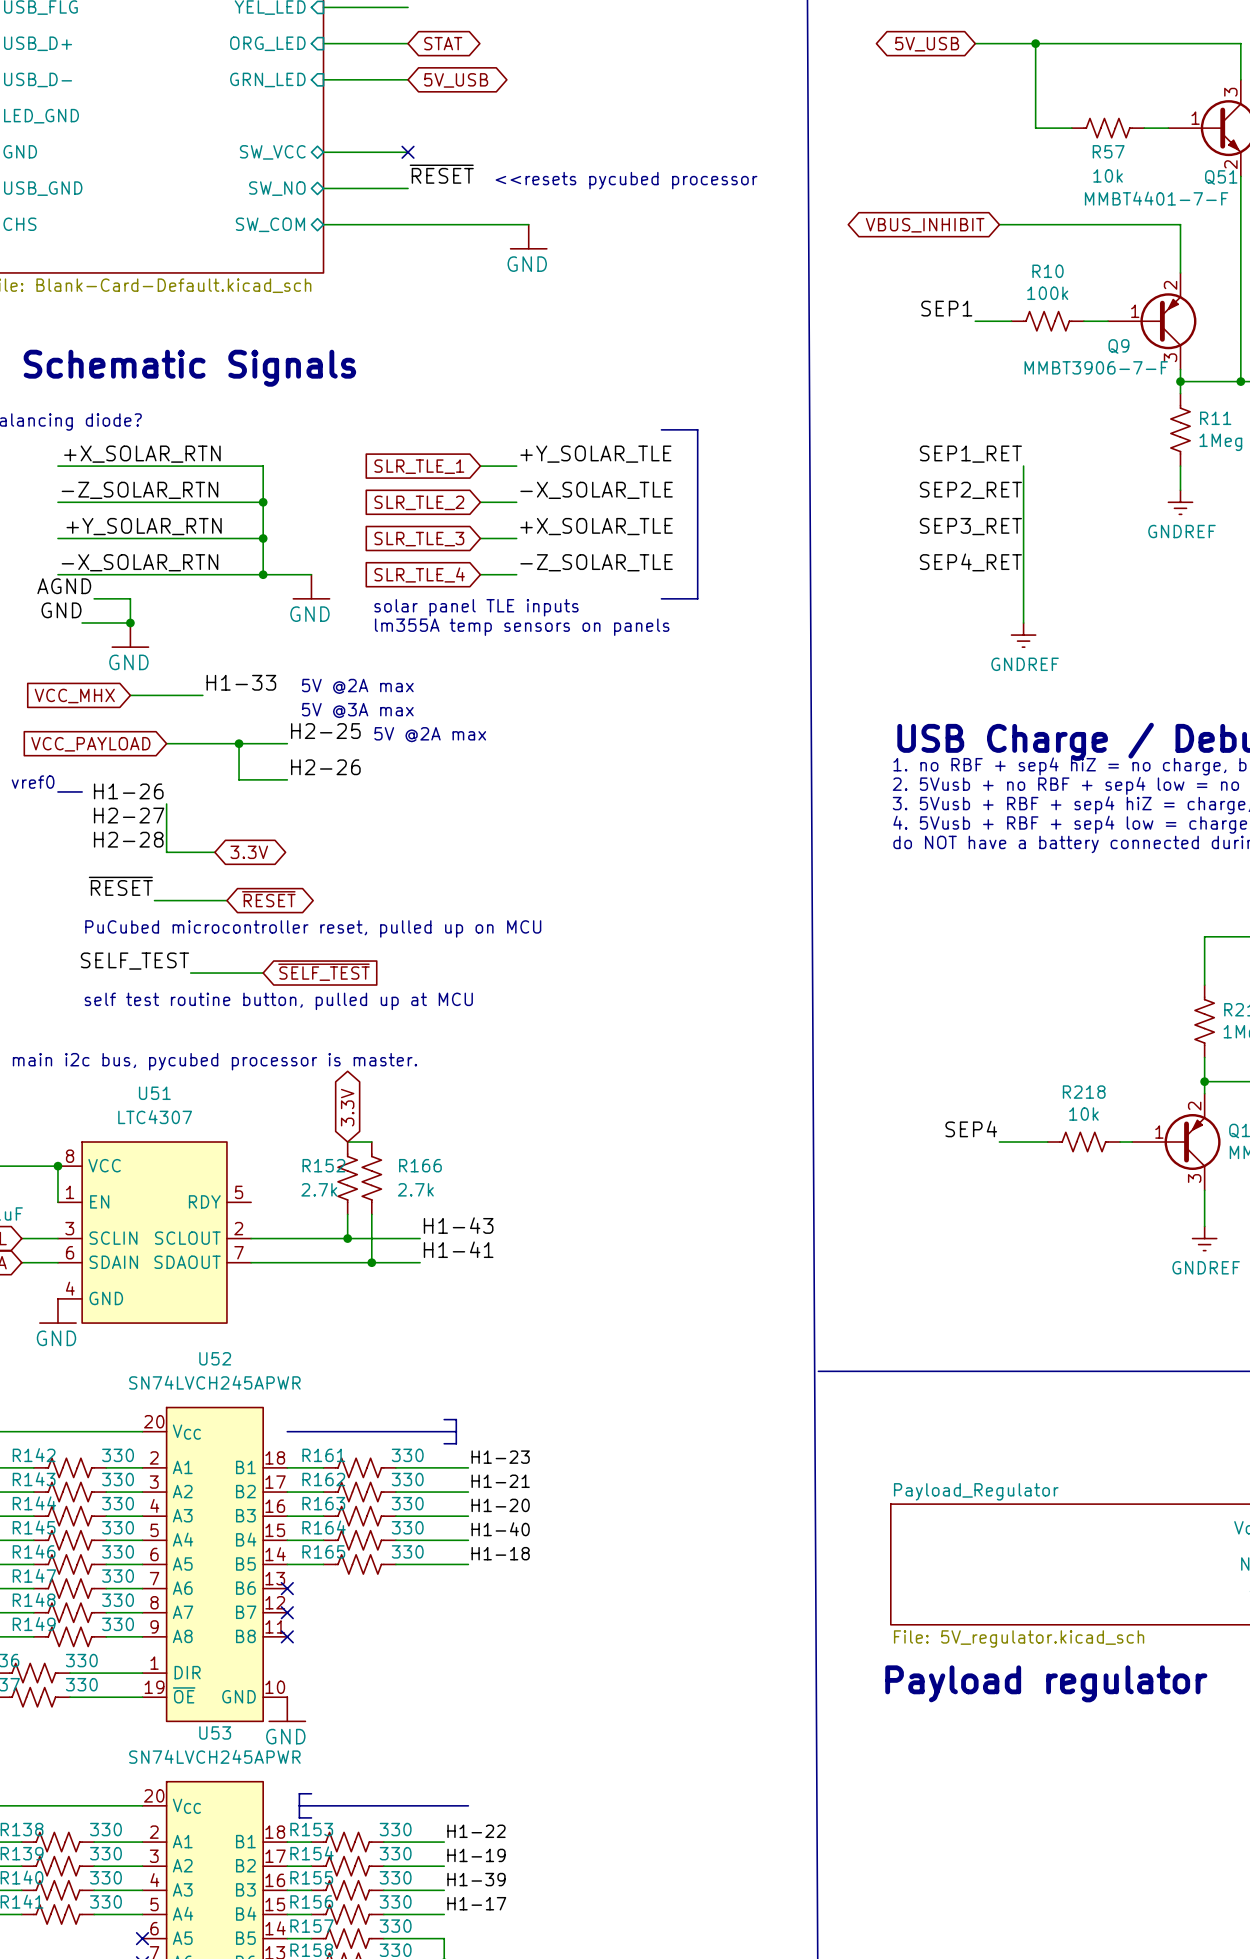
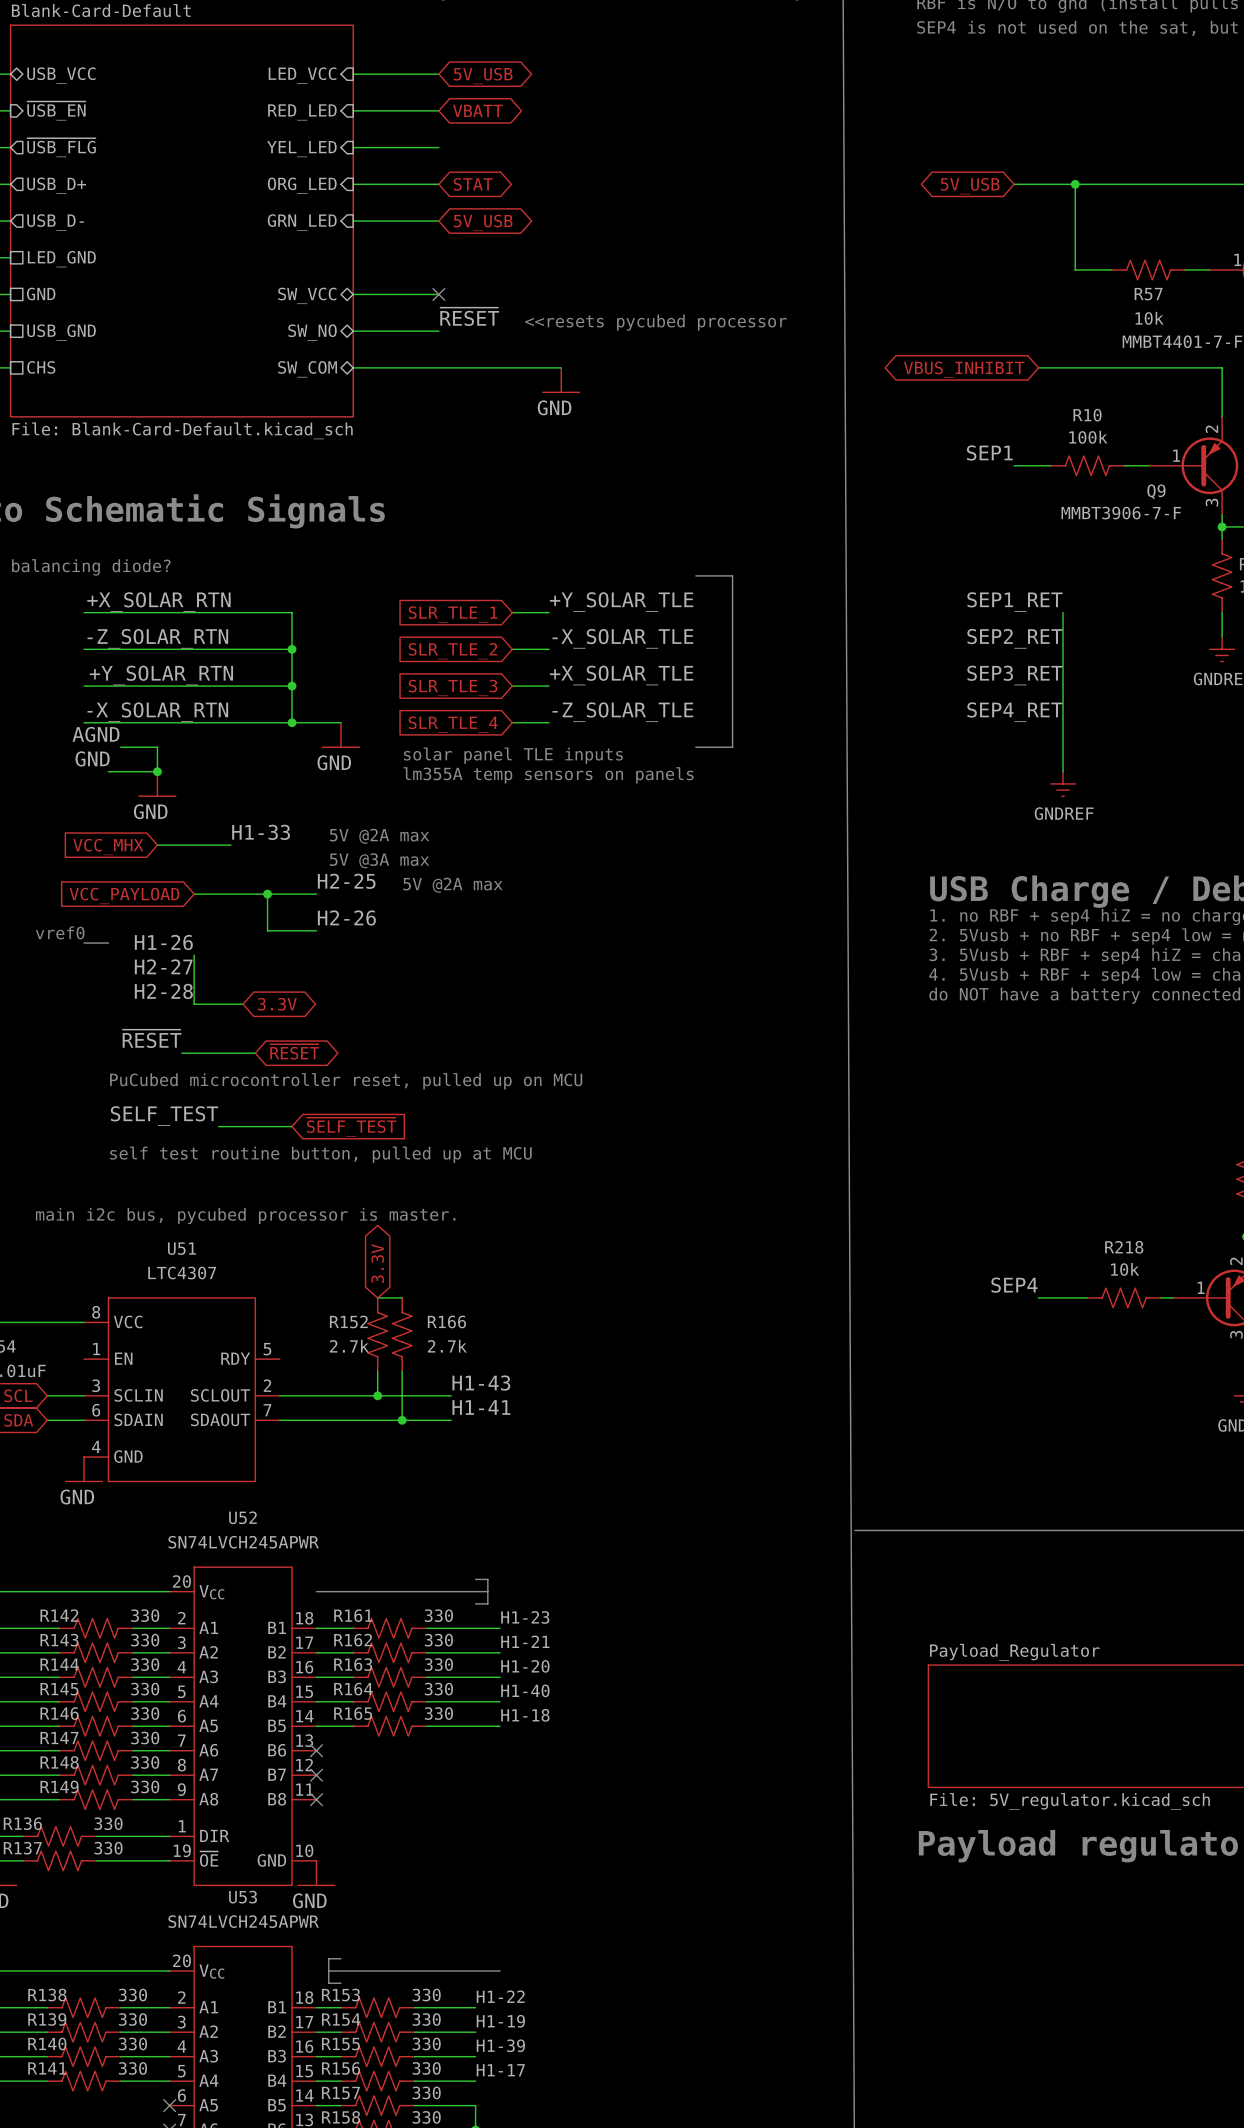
wire: (57, 1166) (57, 1202) -> none
junction: (57, 1166) -> none

